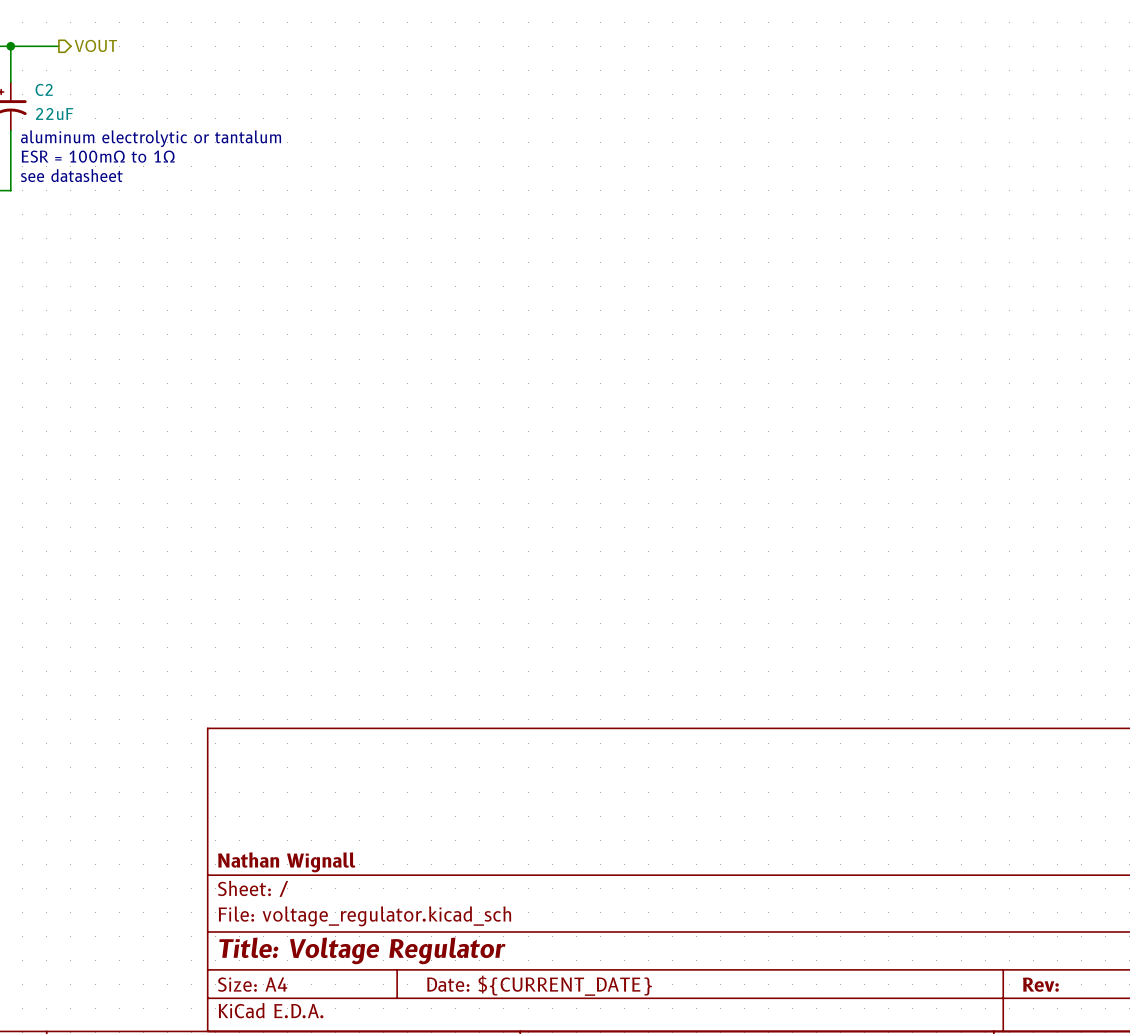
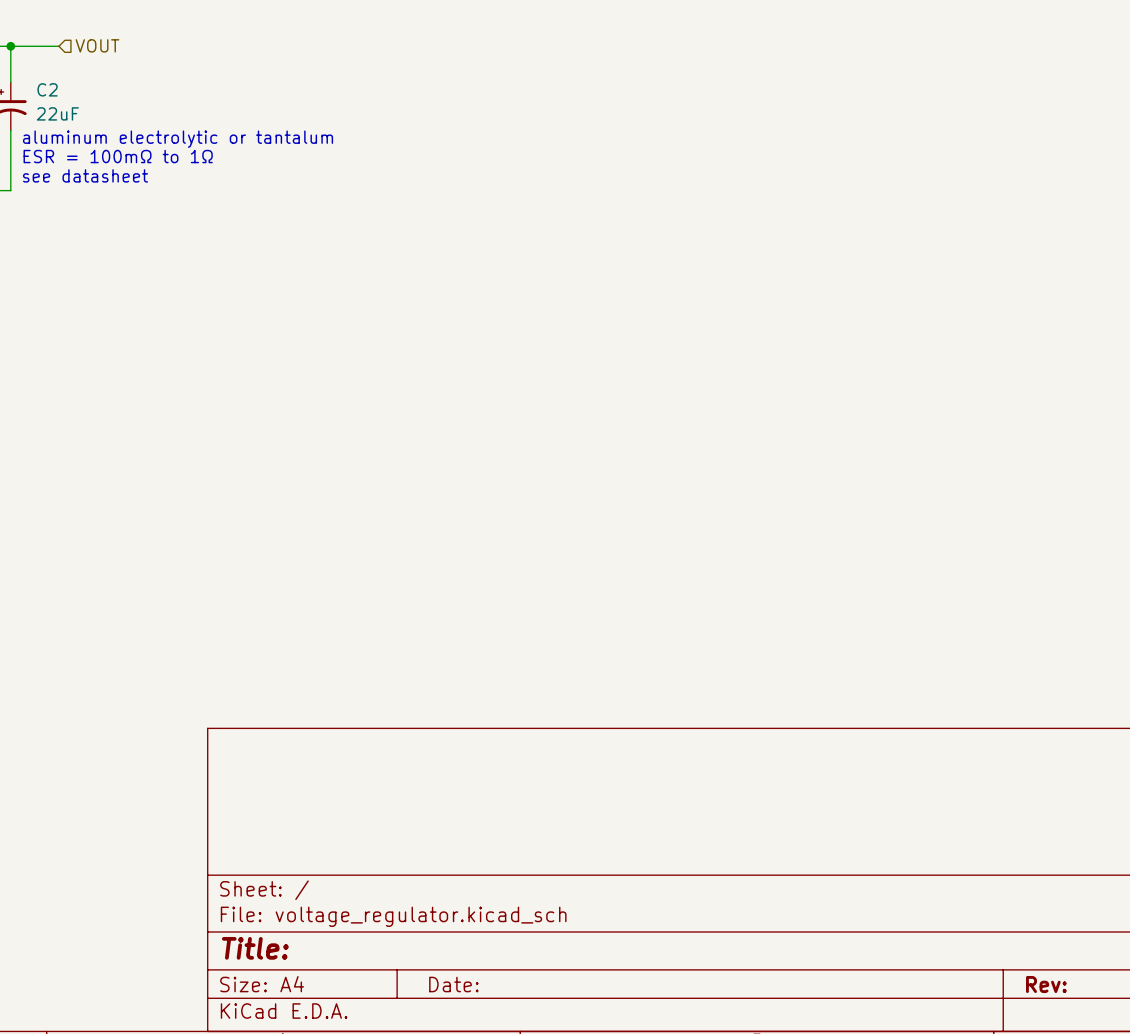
hierarchical label shape: output (95, 45) -> input (97, 45)
title block: Nathan Wignall (286, 862) -> none
title block: Title: Voltage Regulator (362, 950) -> Title: (255, 948)
title block: Date: ${CURRENT_DATE} (539, 985) -> Date: (453, 984)

